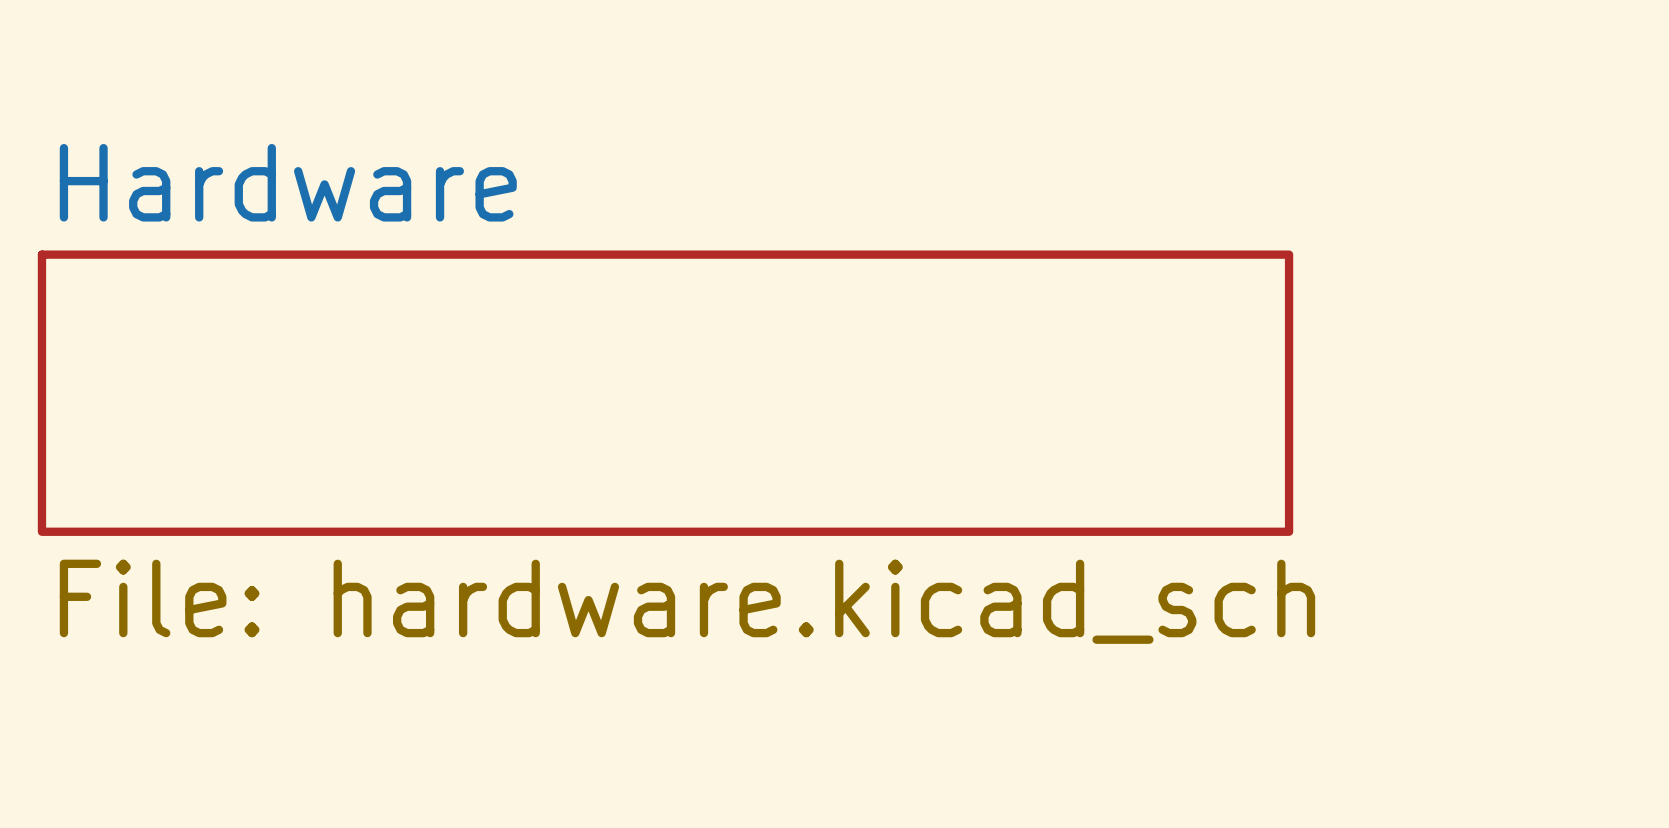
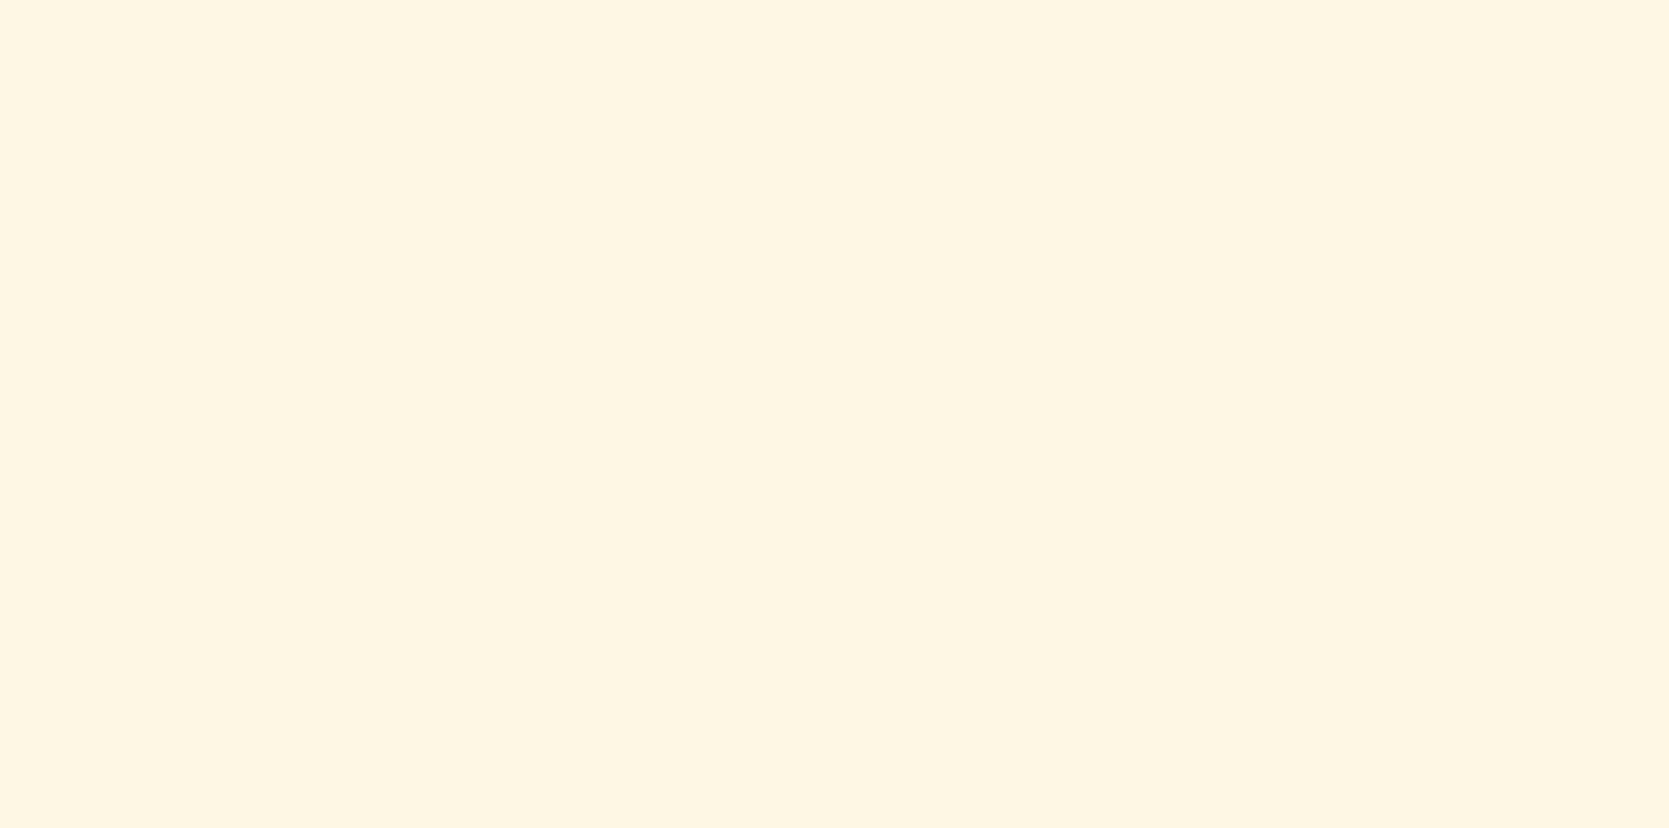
sheet Hardware: File: hardware.kicad_sch (665, 393) -> none

